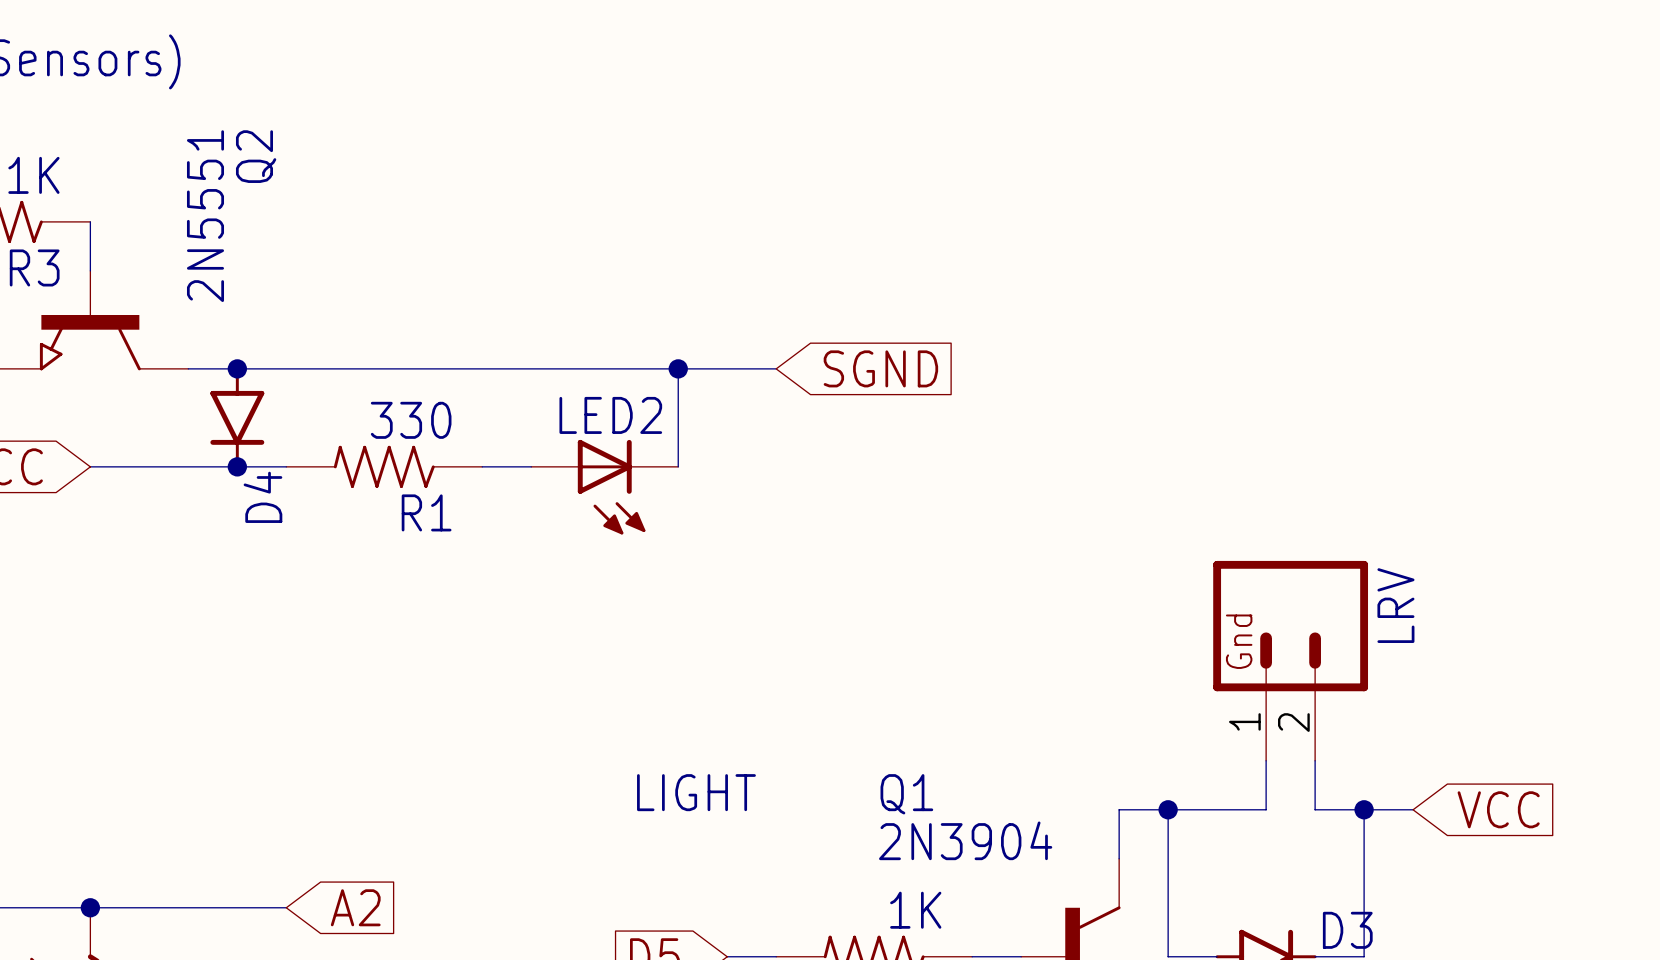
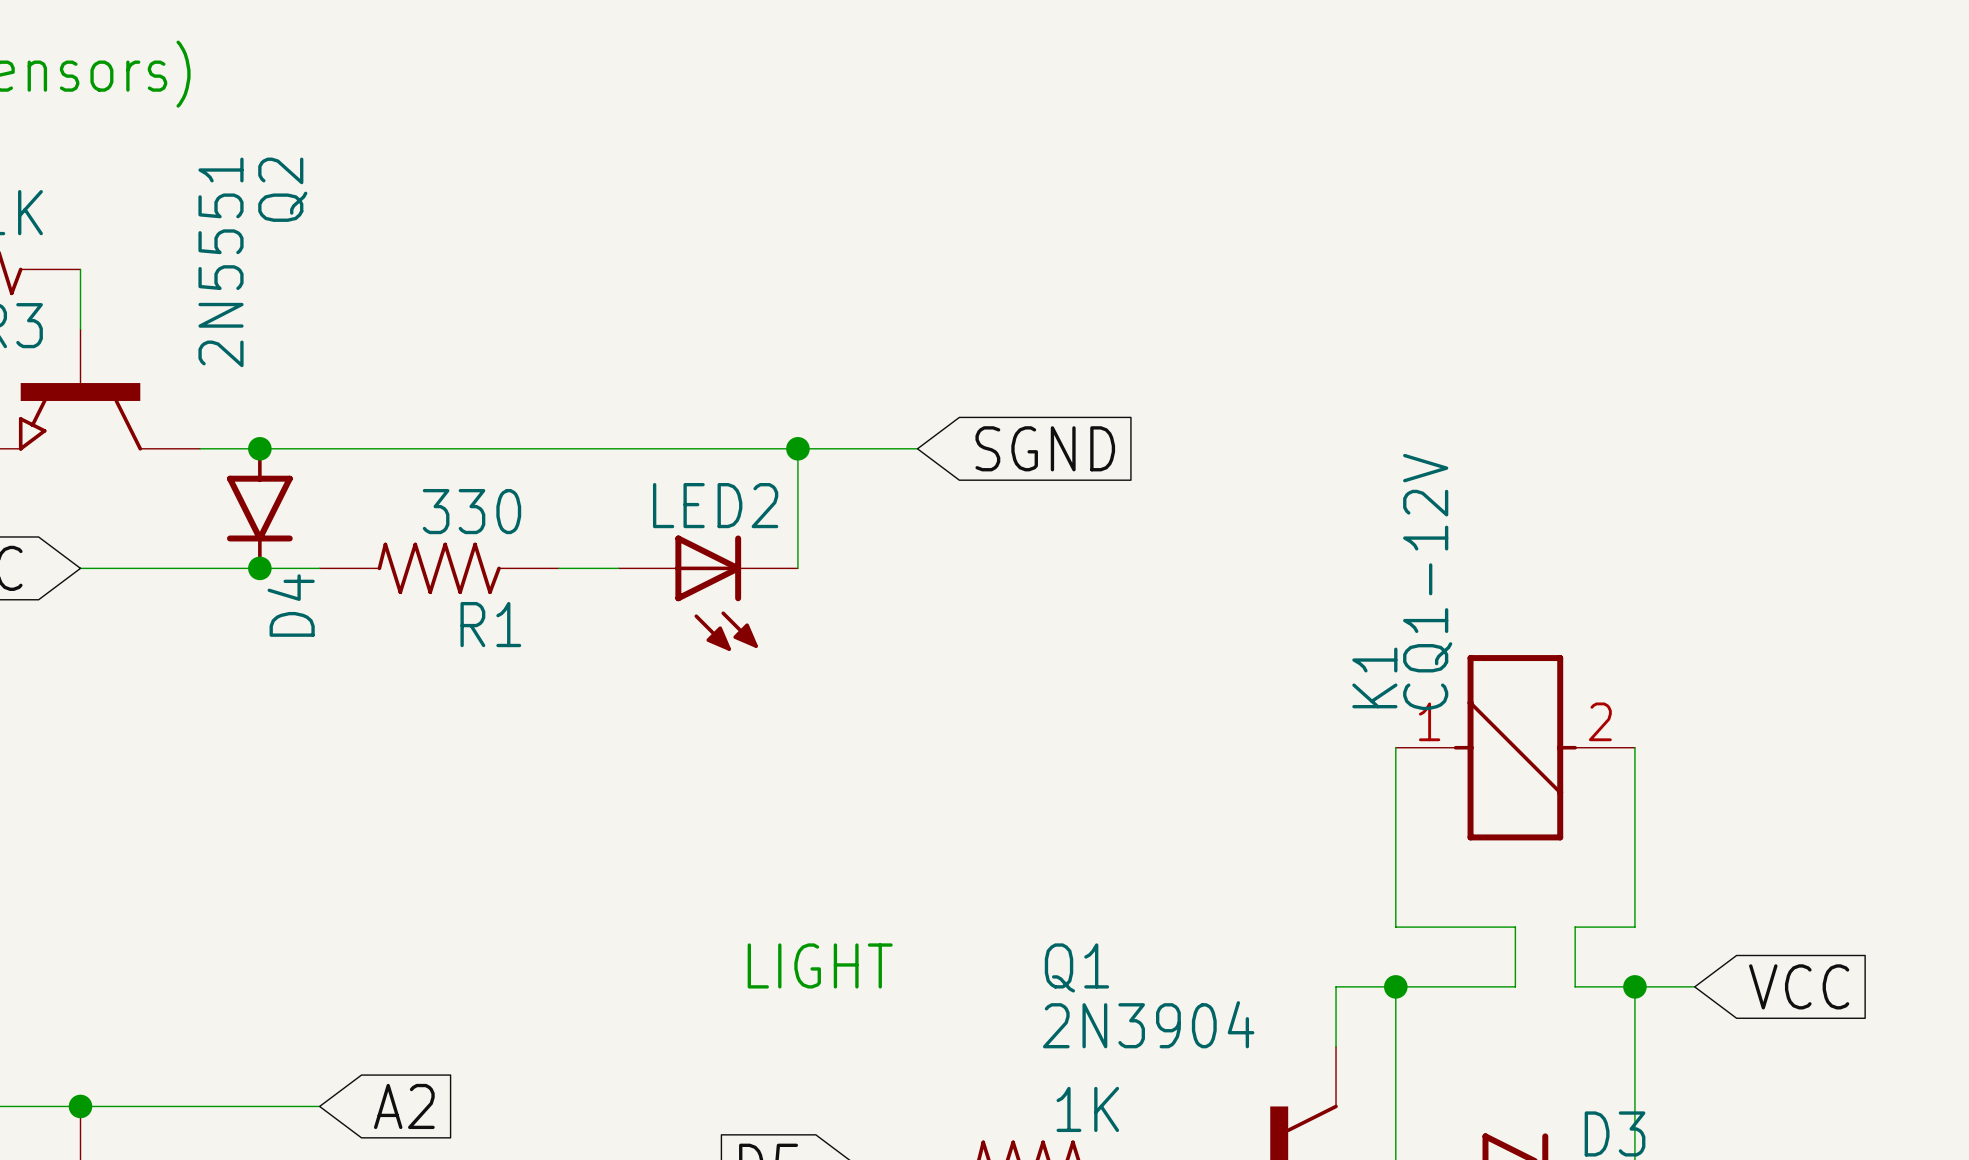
wire: none -> (1395, 747) (1395, 927) (1515, 927)
K1: none -> CQ1-12V (1515, 747)
wire: none -> (1634, 747) (1634, 927) (1575, 927)
LRV: (1290, 660) -> none

